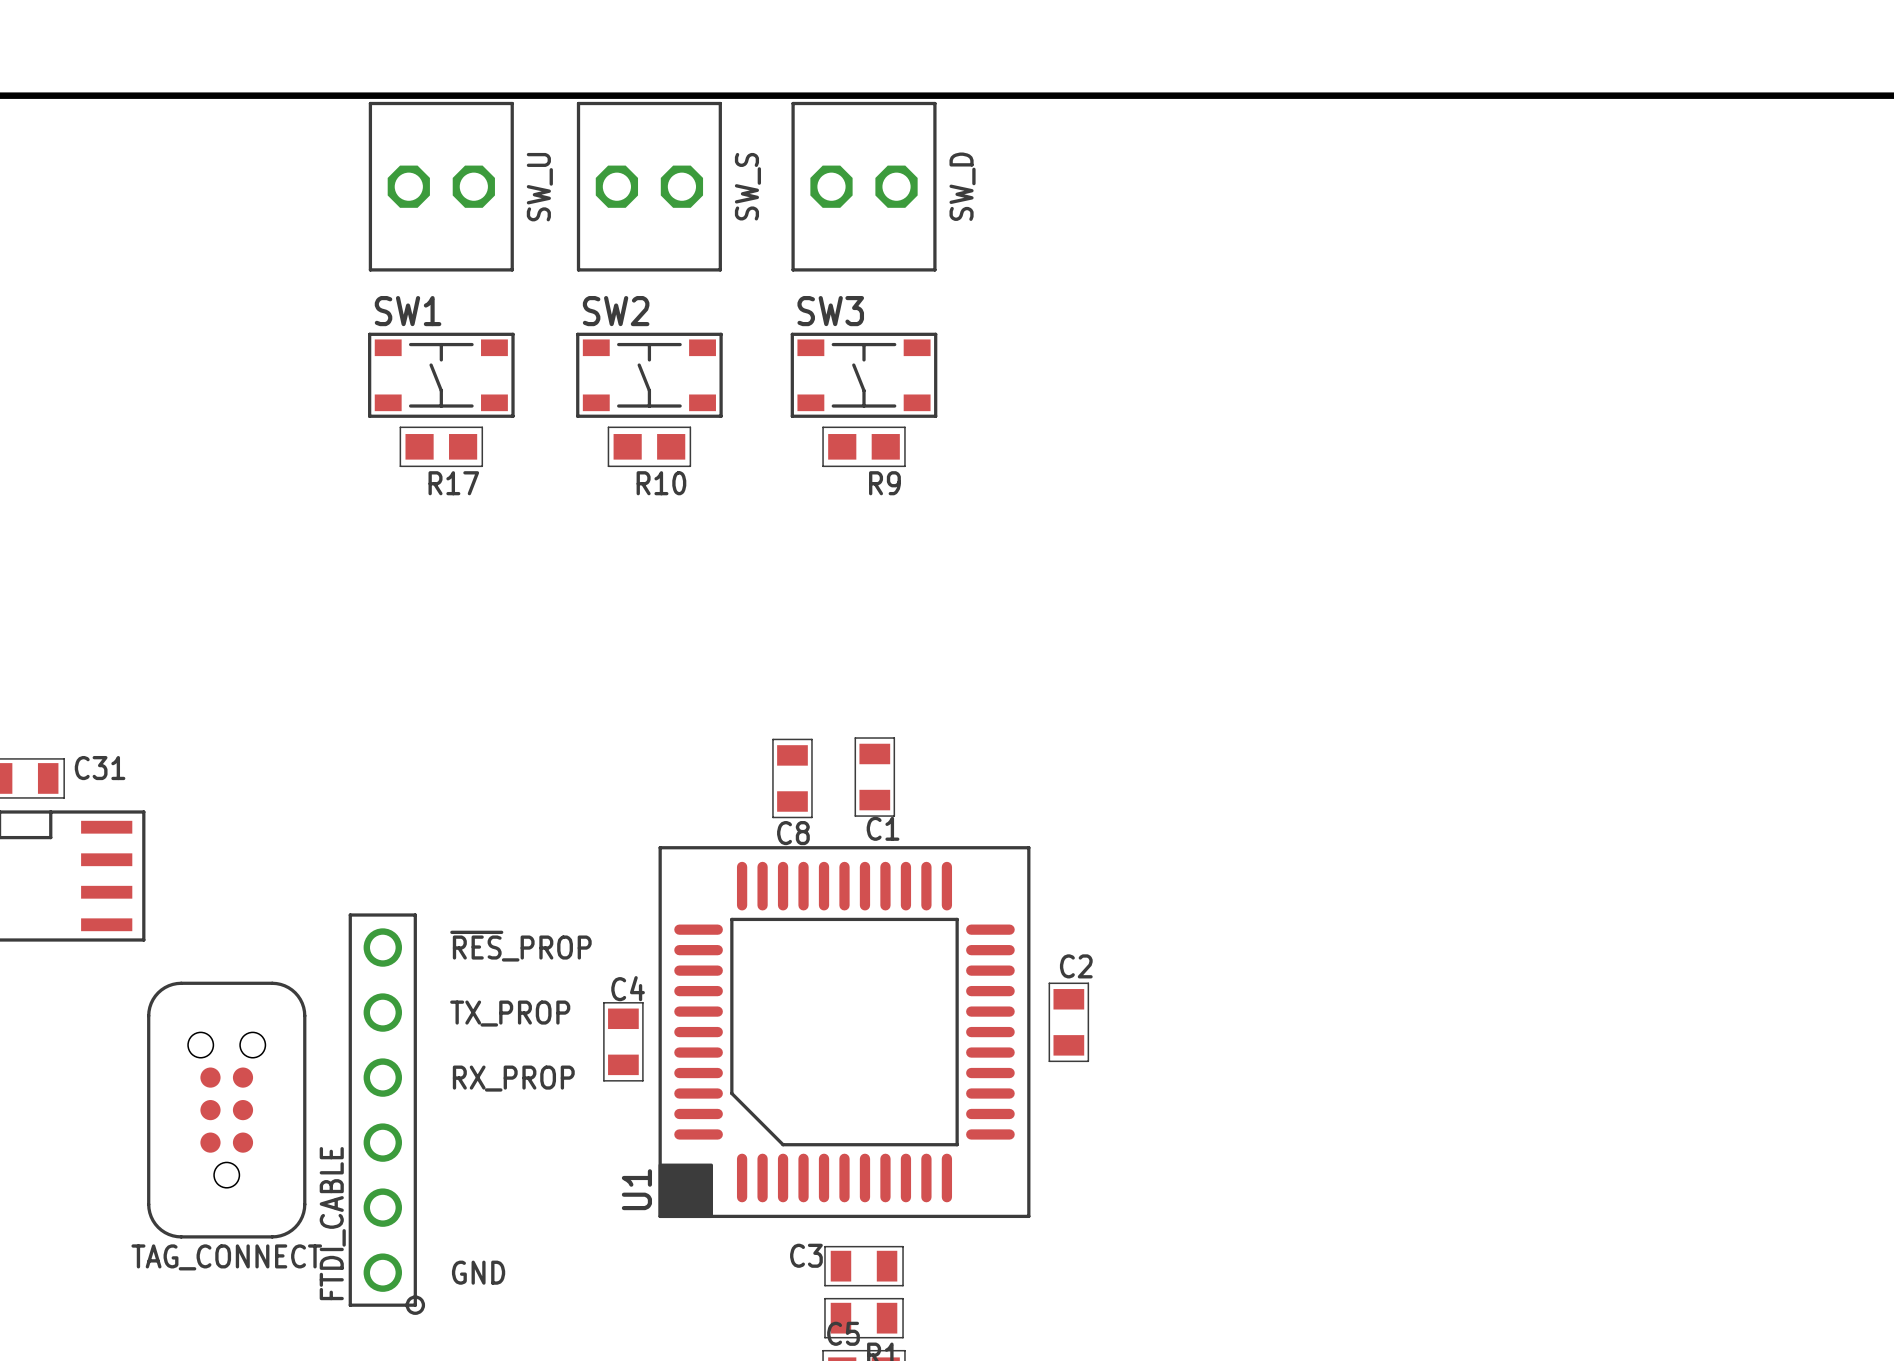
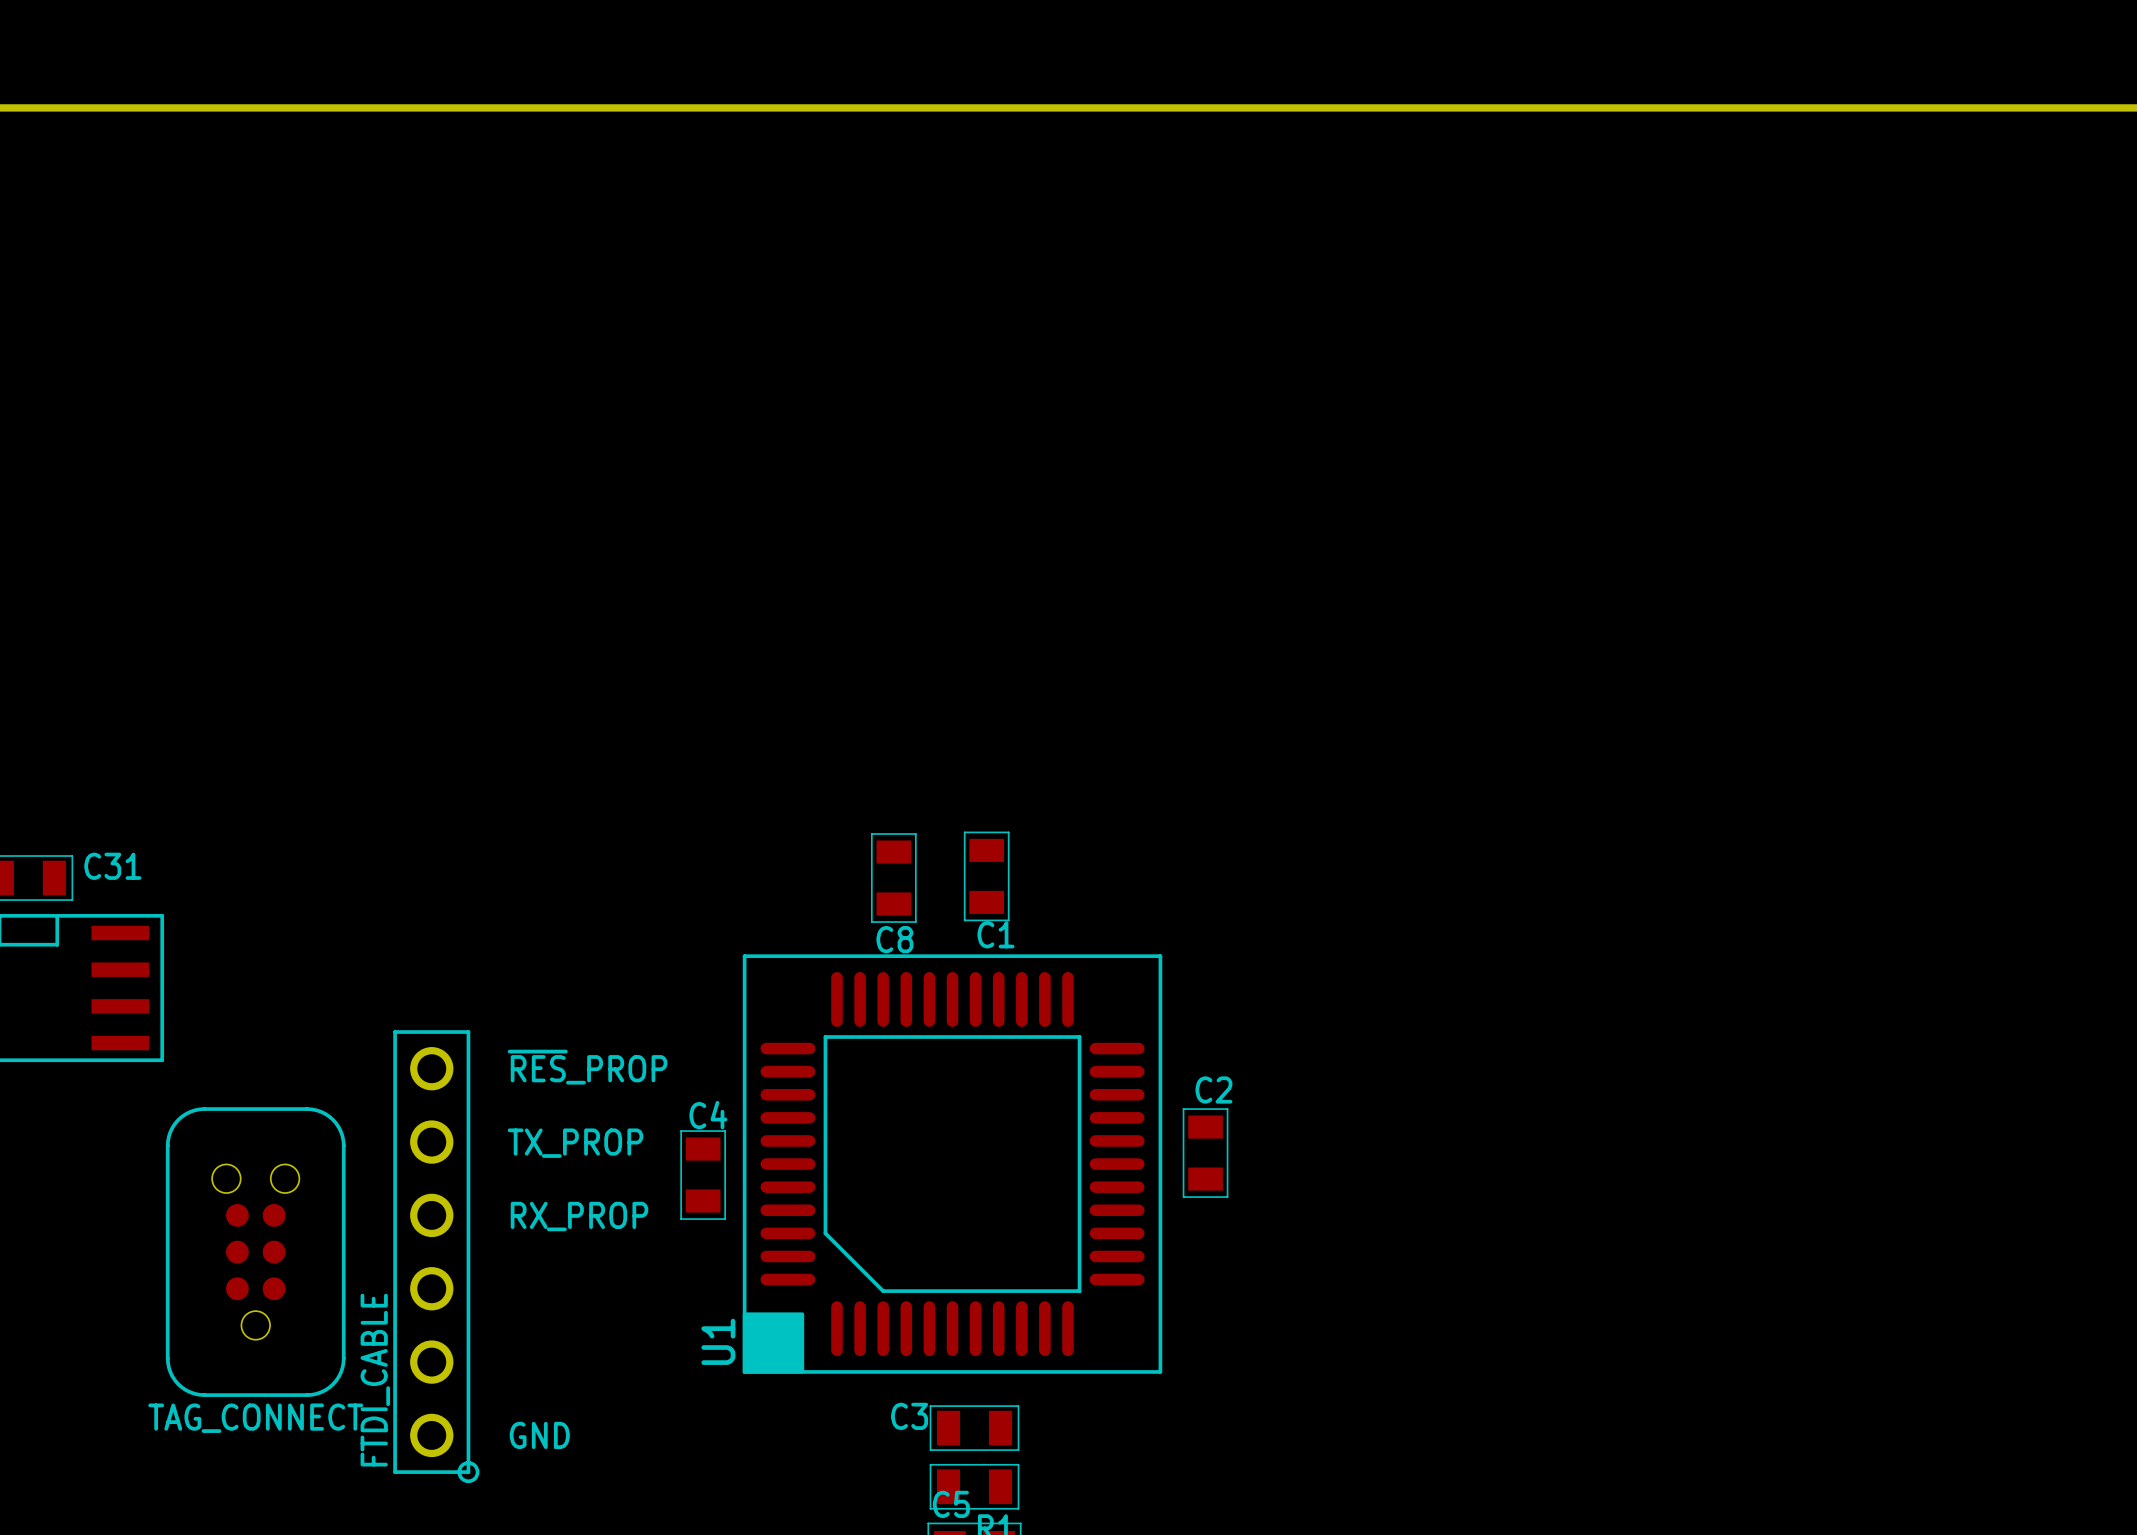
SW_U: (441, 186) -> none
SW_S: (649, 186) -> none
SW_D: (864, 186) -> none
SW1: (441, 375) -> none
SW2: (649, 375) -> none
SW3: (864, 375) -> none
R17: (441, 446) -> none
R10: (649, 446) -> none
R9: (864, 446) -> none

